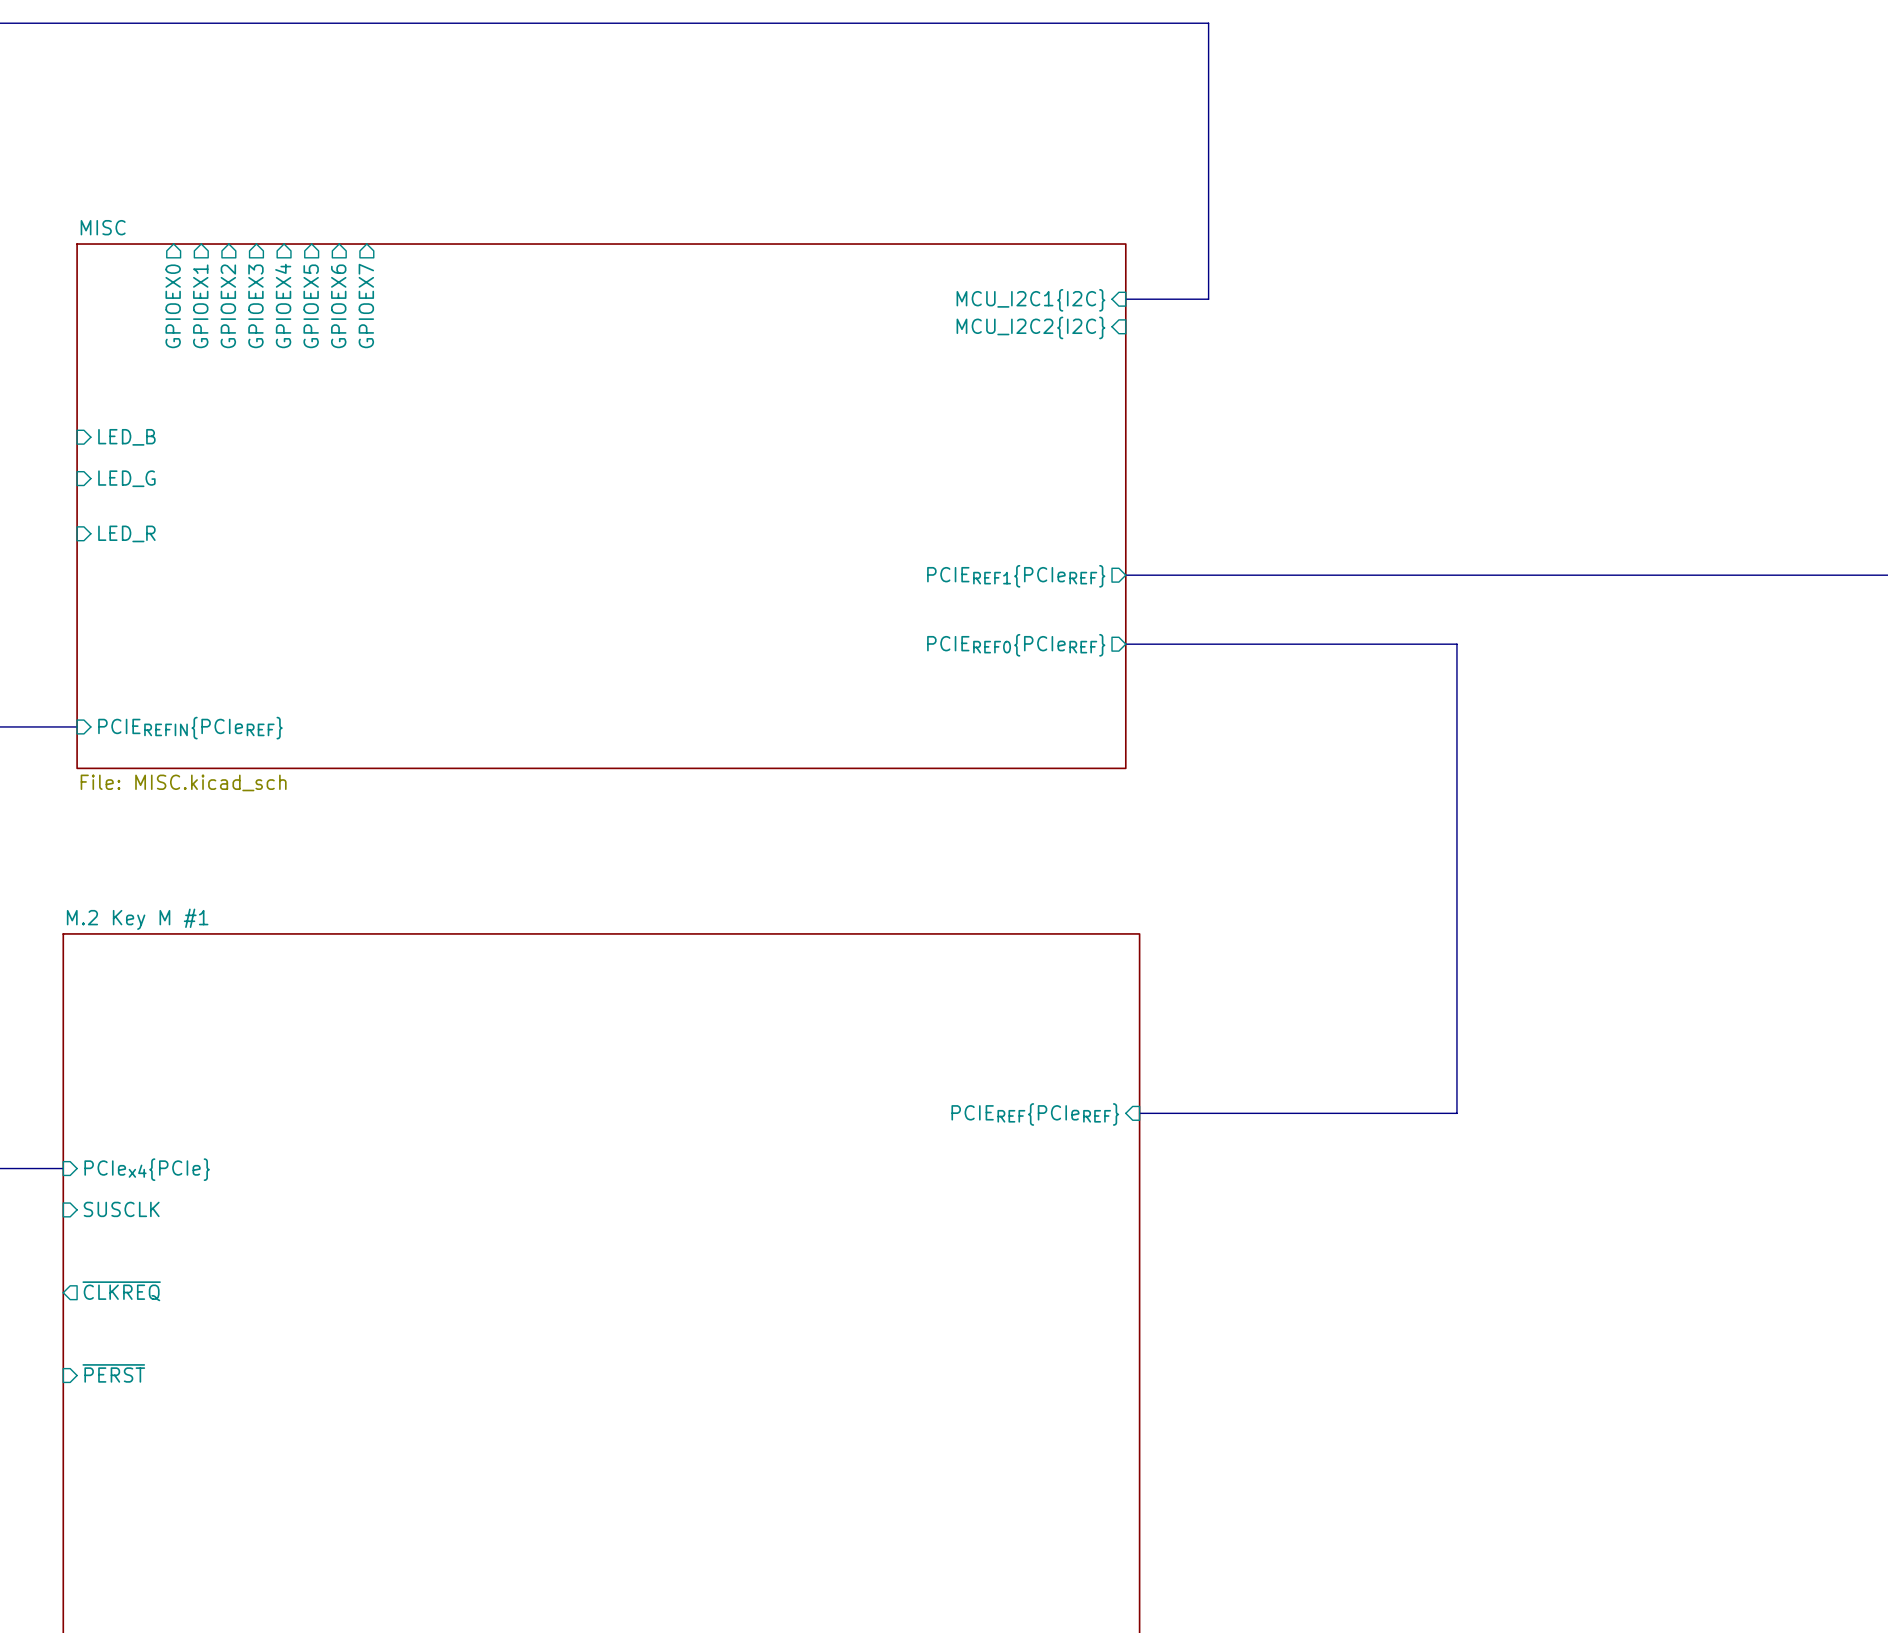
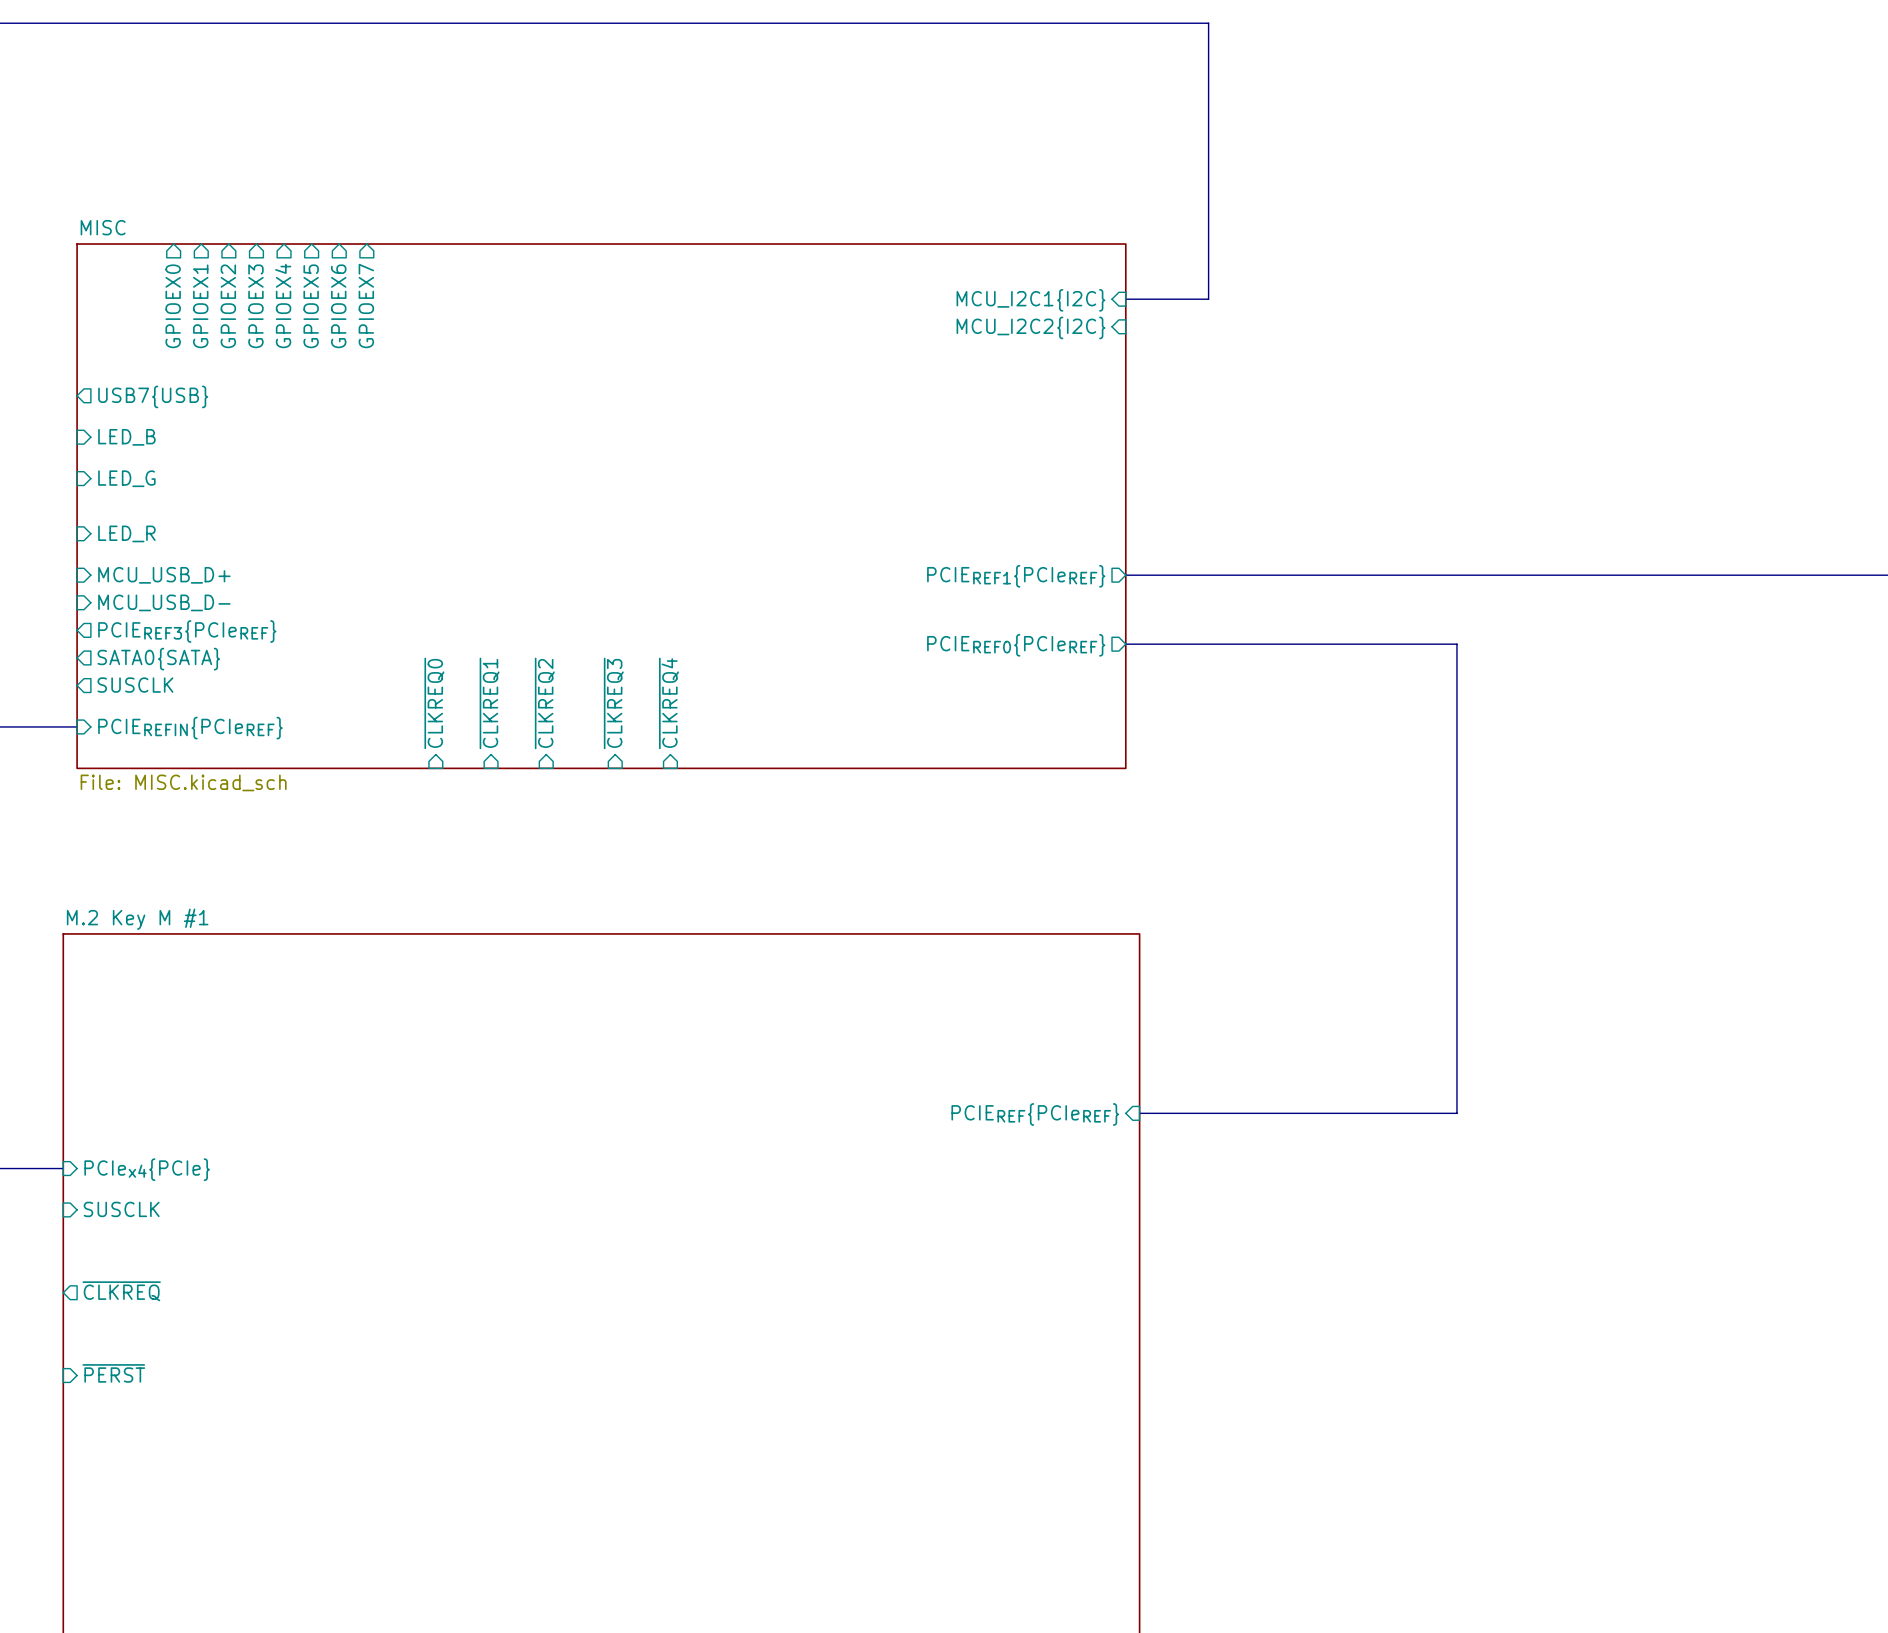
sheet pin: none -> USB7{USB} (153, 396)
sheet pin: none -> MCU_USB_D+ (164, 575)
sheet pin: none -> MCU_USB_D- (164, 602)
sheet pin: none -> PCIEREF3{PCIeREF} (187, 631)
sheet pin: none -> SATA0{SATA} (158, 659)
sheet pin: none -> SUSCLK (135, 685)
sheet pin: none -> ~{CLKREQ0} (434, 703)
sheet pin: none -> ~{CLKREQ1} (489, 703)
sheet pin: none -> ~{CLKREQ2} (544, 703)
sheet pin: none -> ~{CLKREQ3} (613, 703)
sheet pin: none -> ~{CLKREQ4} (668, 703)

